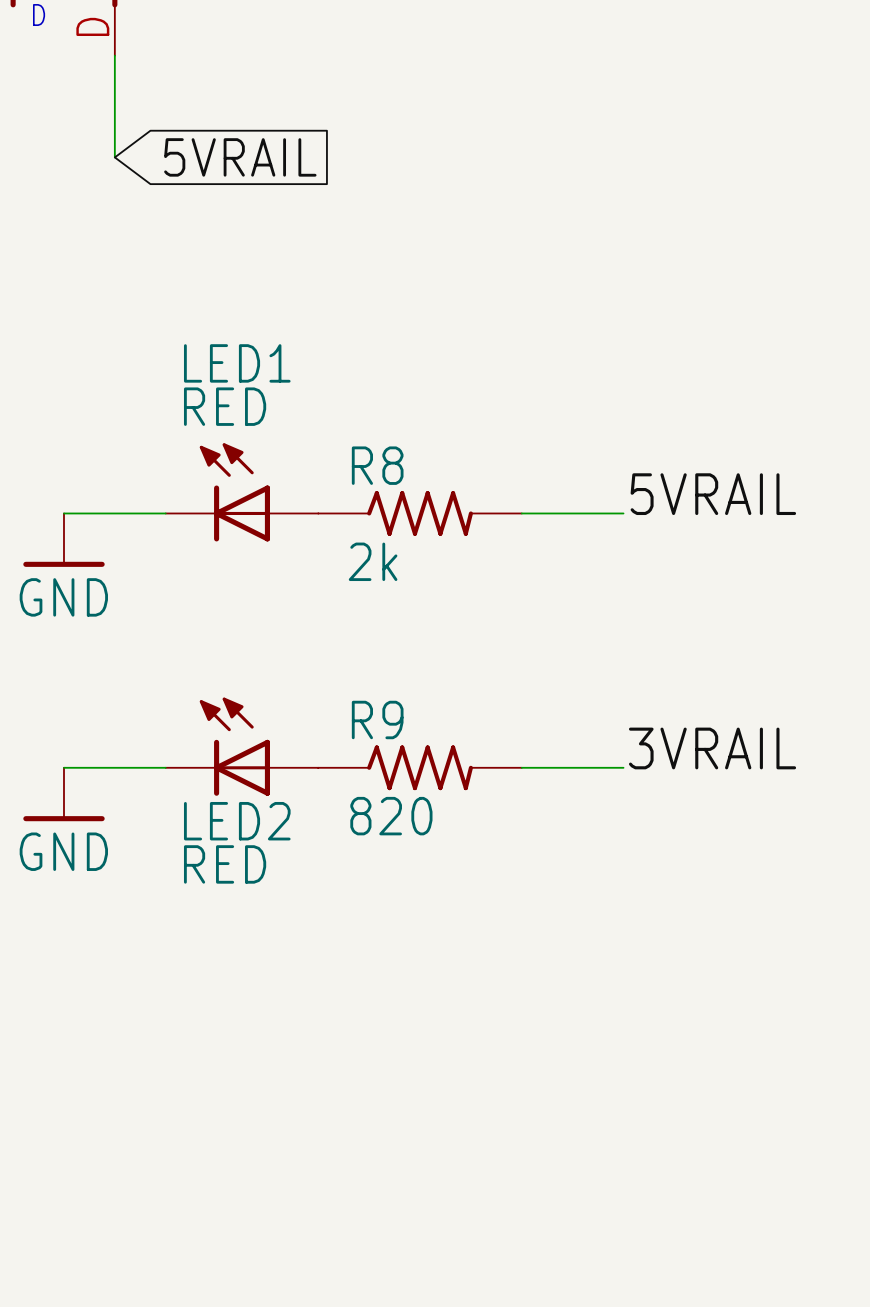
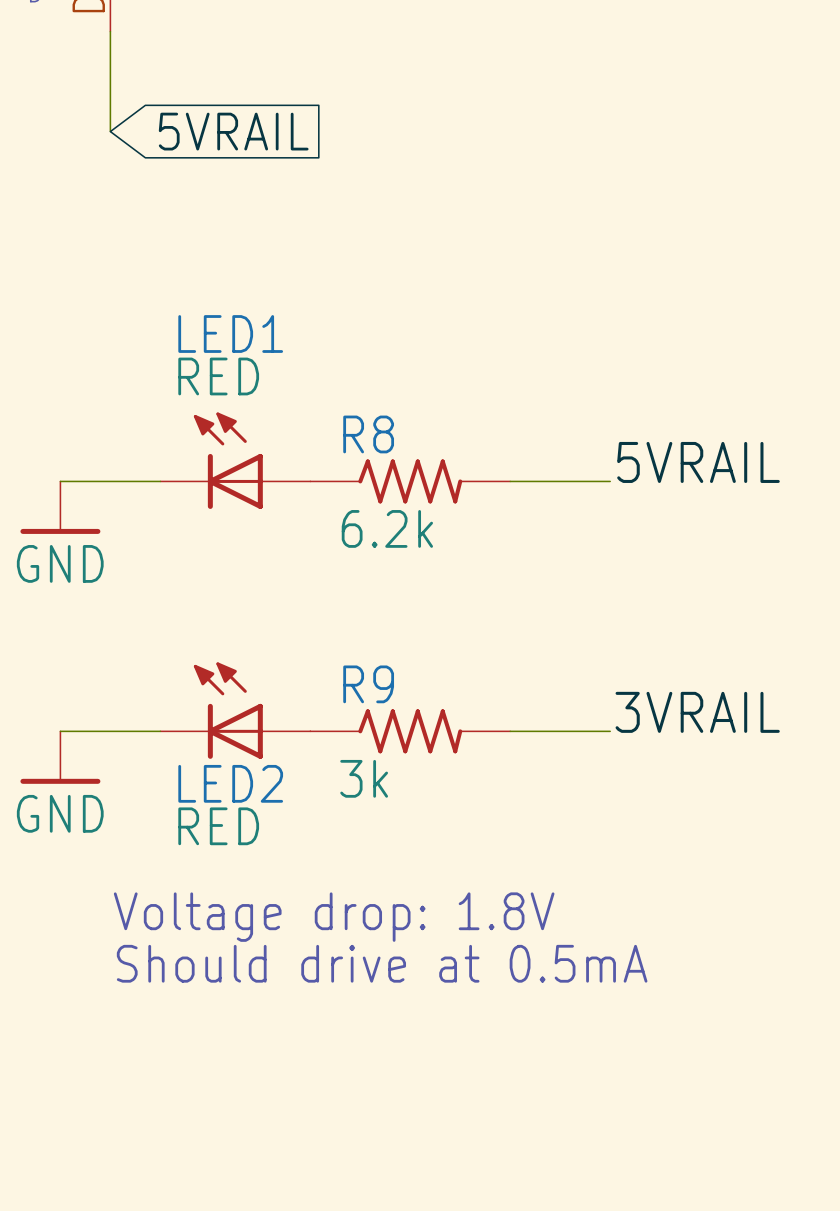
R8 value: 2k (373, 561) -> 6.2k (387, 528)
R9 value: 820 (391, 816) -> 3k (364, 778)
text: none -> Voltage drop: 1.8V (334, 917)
text: none -> Should drive at 0.5mA (382, 963)

